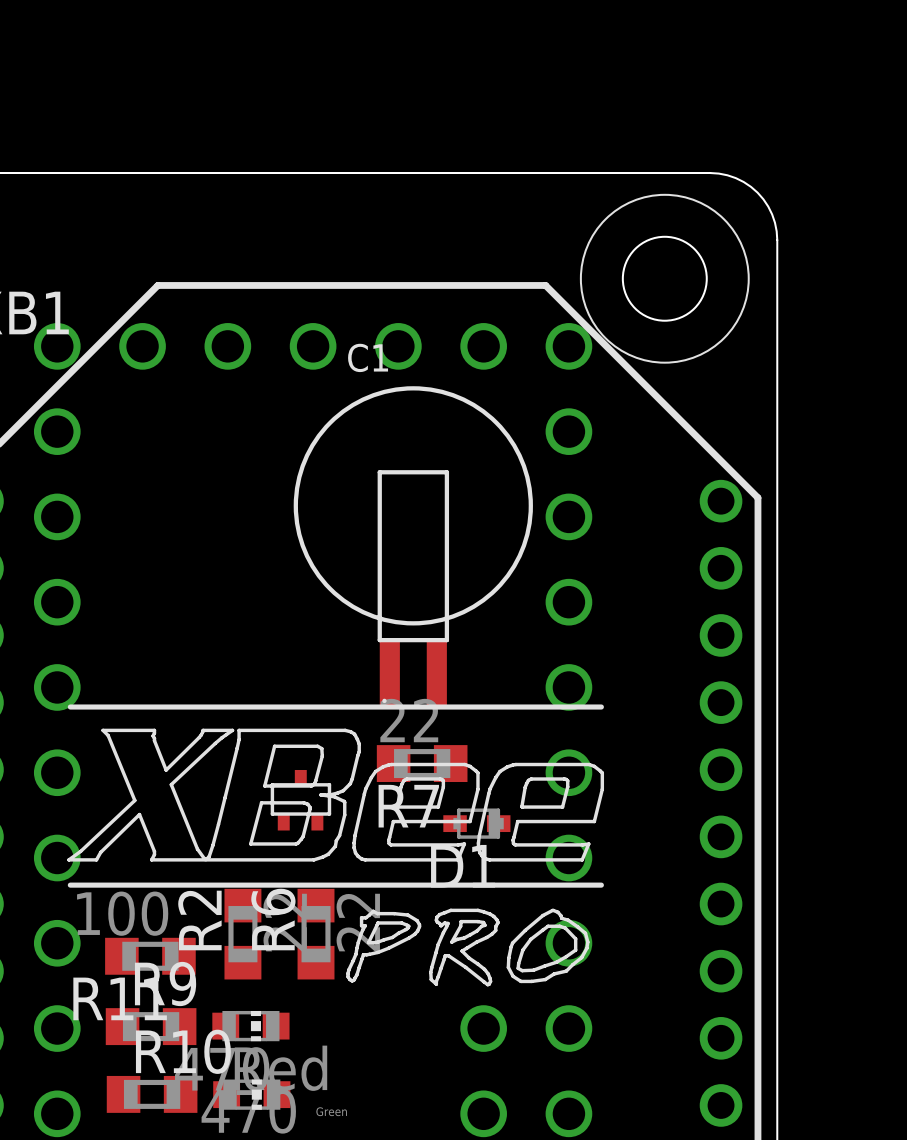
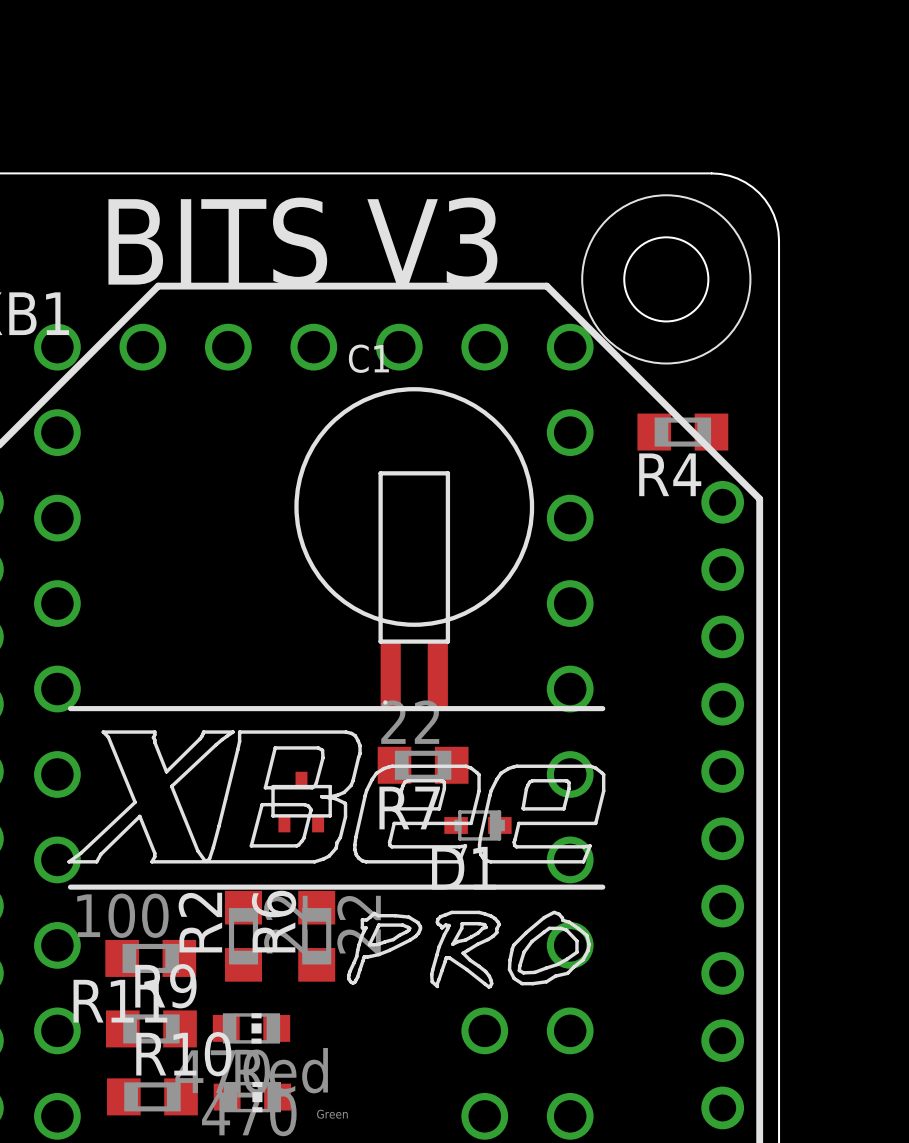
text: none -> BITS V3 (302, 241)
R4: none -> (682, 432)

